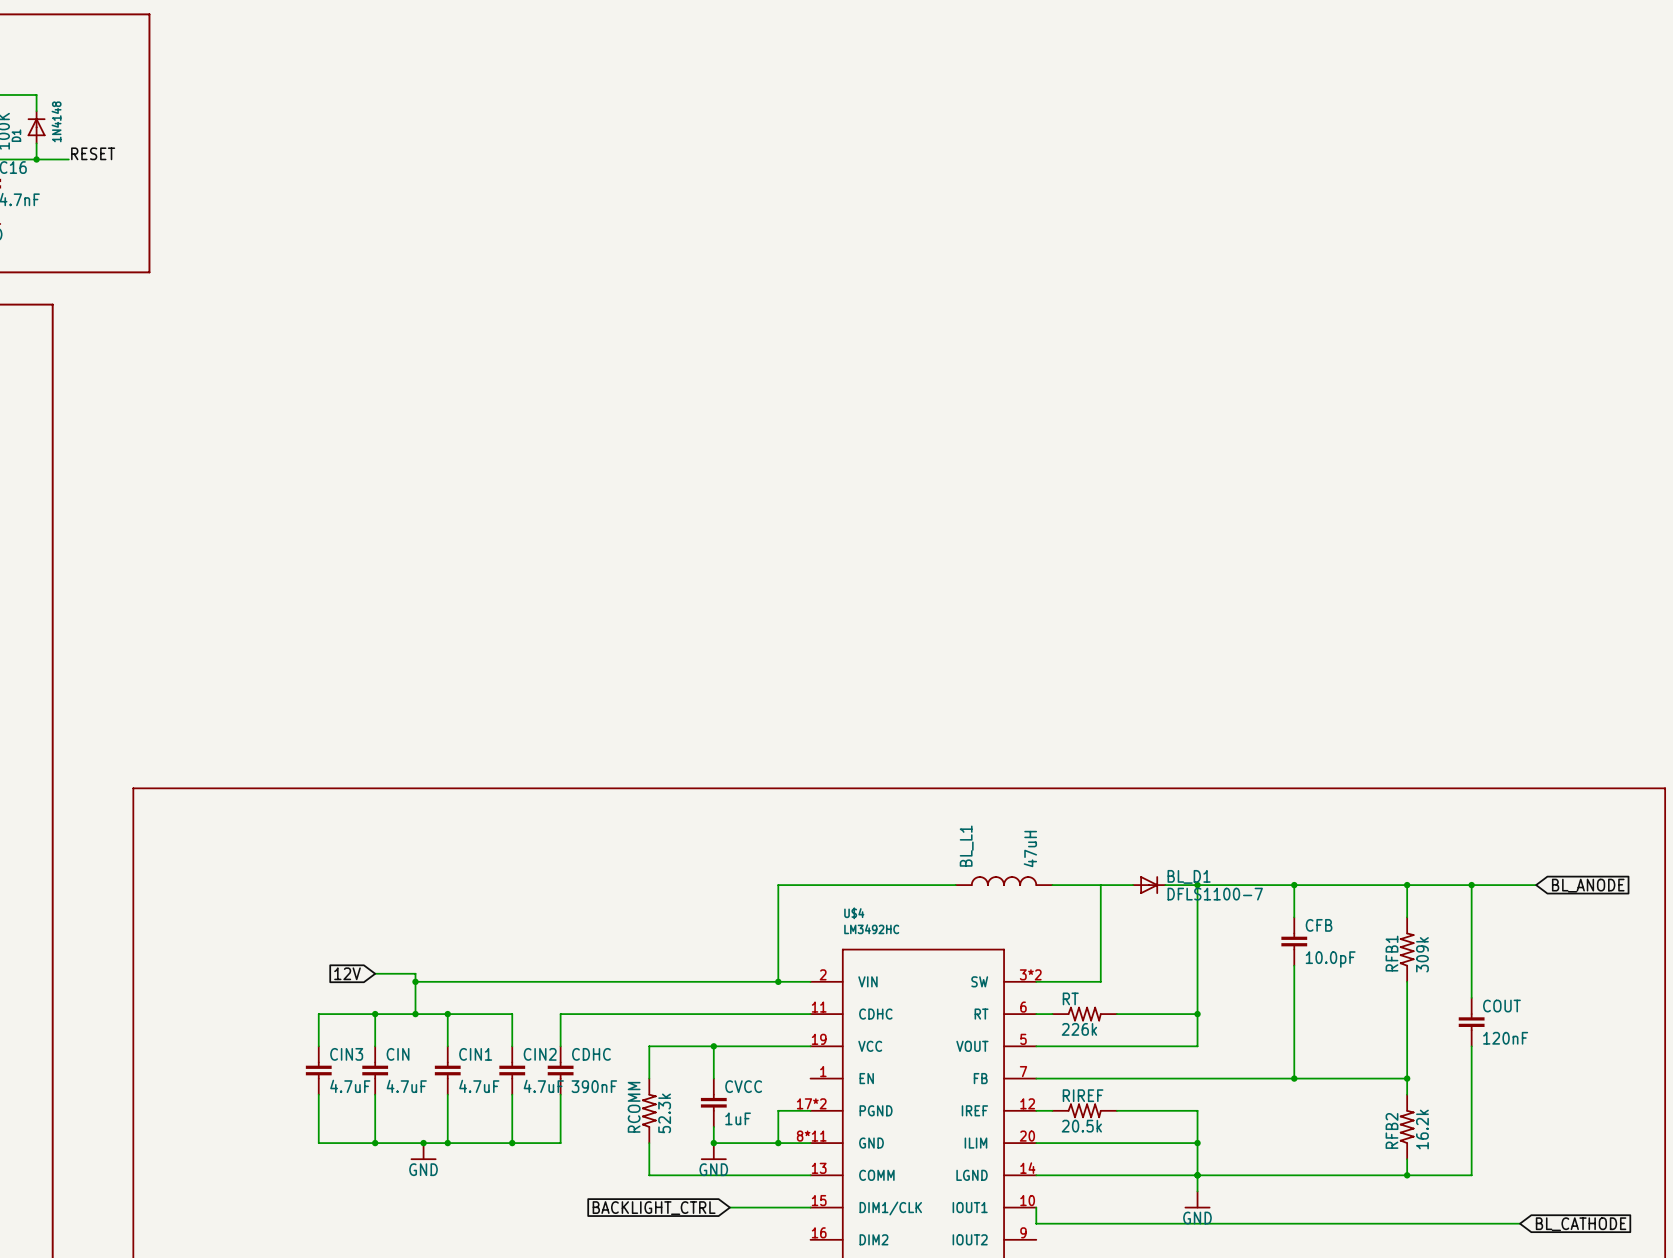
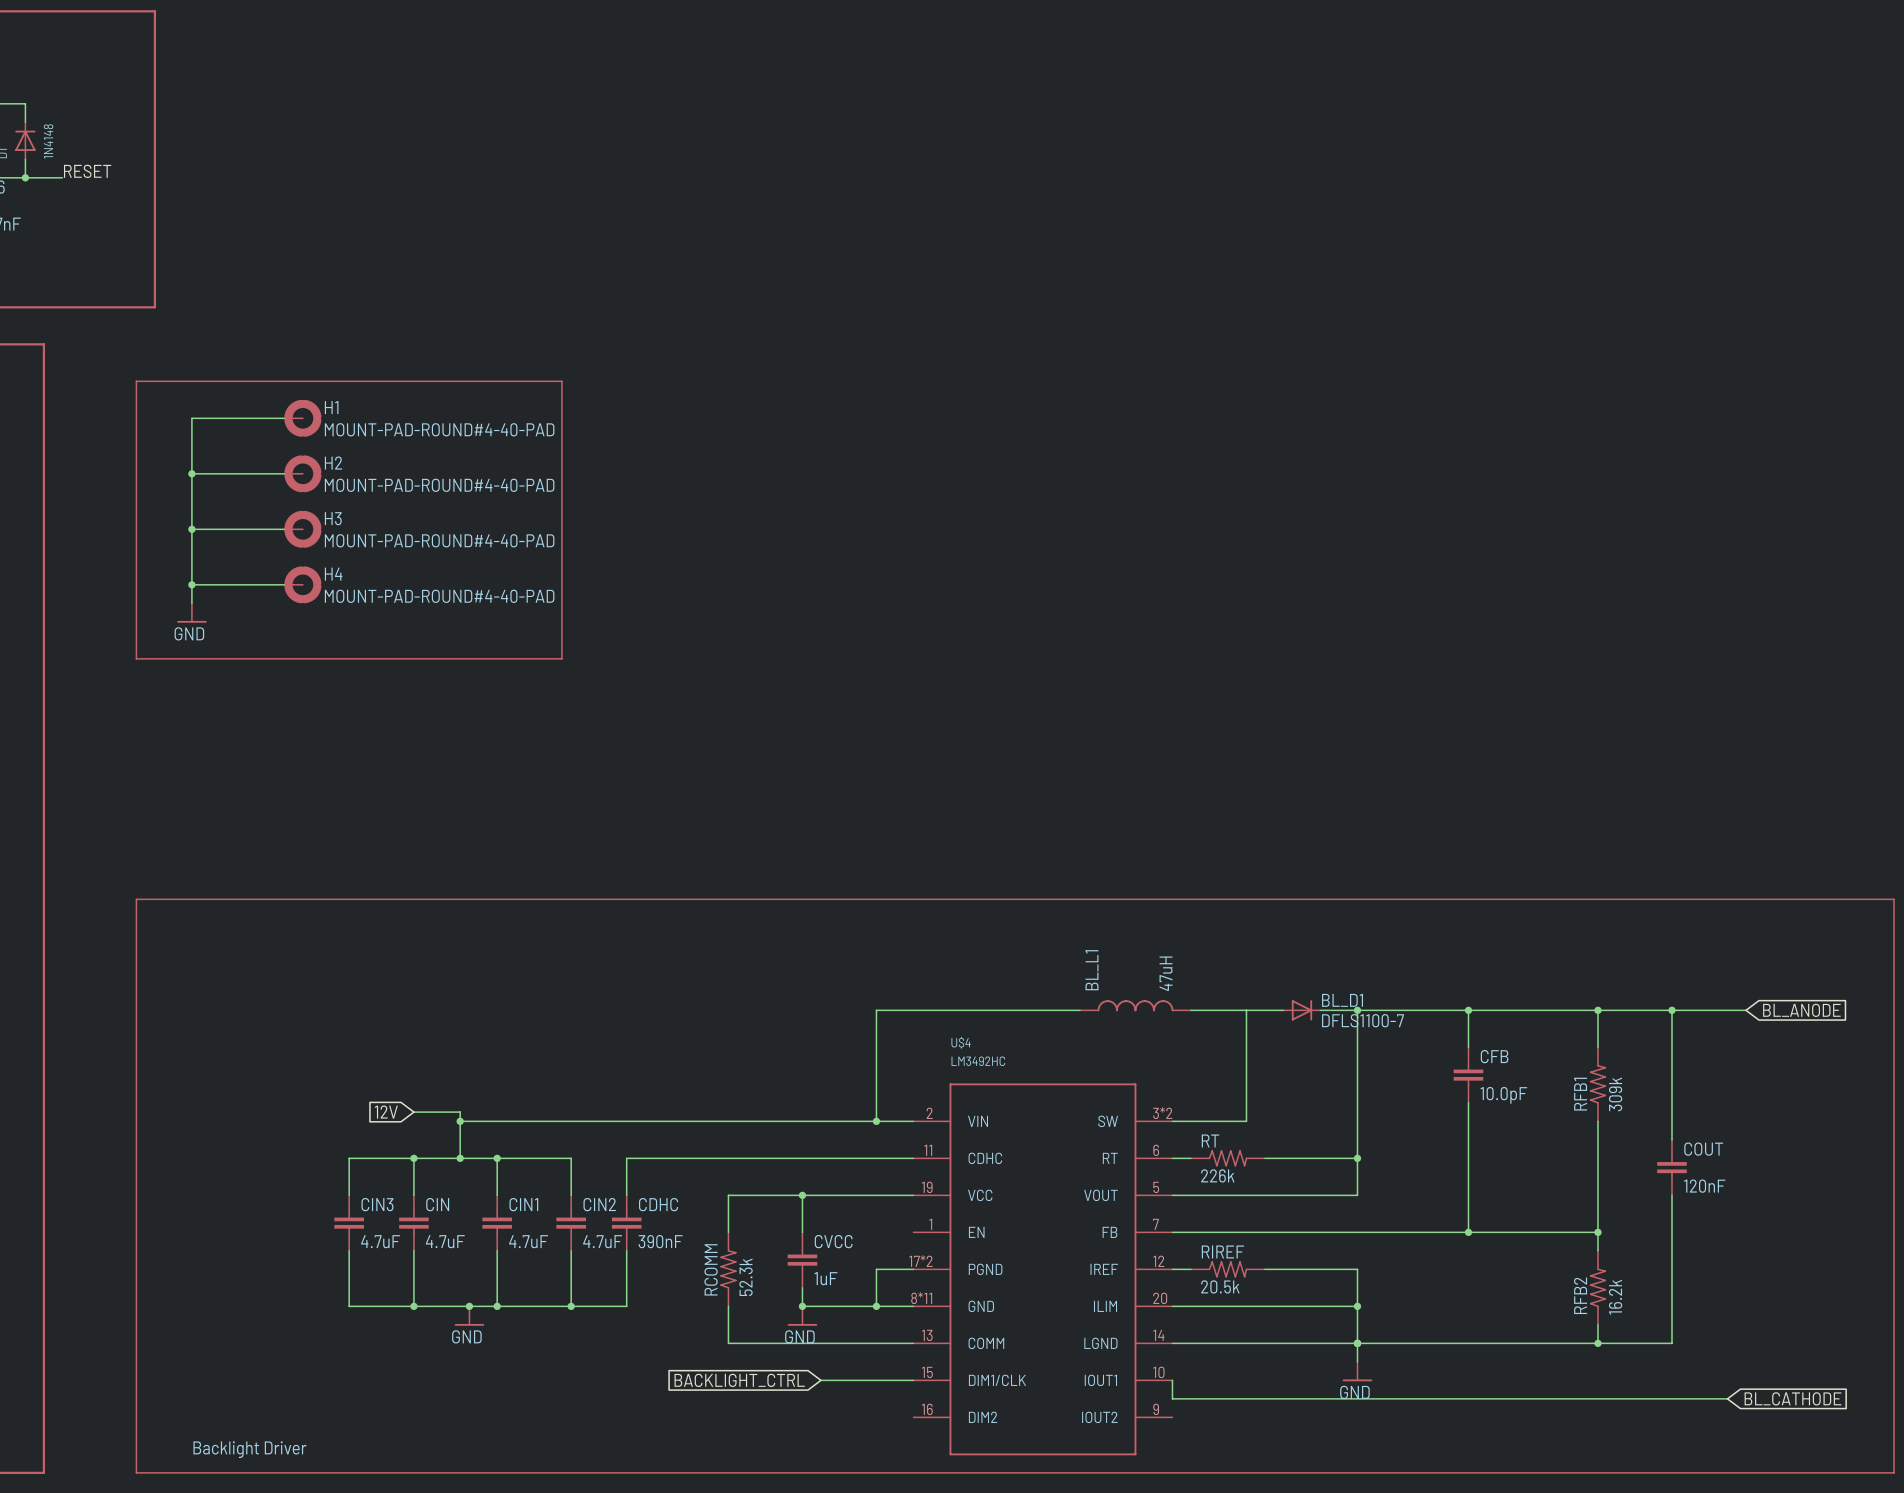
line: none -> (136, 381) (561, 381) (561, 658) (136, 658) (136, 381)
wire: none -> (284, 418) (191, 418) (191, 603)
H1: none -> MOUNT-PAD-ROUND#4-40-PAD (302, 418)
wire: none -> (191, 473) (284, 473)
junction: none -> (191, 473)
H2: none -> MOUNT-PAD-ROUND#4-40-PAD (302, 473)
wire: none -> (191, 529) (284, 529)
junction: none -> (191, 529)
H3: none -> MOUNT-PAD-ROUND#4-40-PAD (302, 529)
wire: none -> (191, 584) (284, 584)
junction: none -> (191, 584)
H4: none -> MOUNT-PAD-ROUND#4-40-PAD (302, 584)
power symbol: none -> GND (191, 613)

